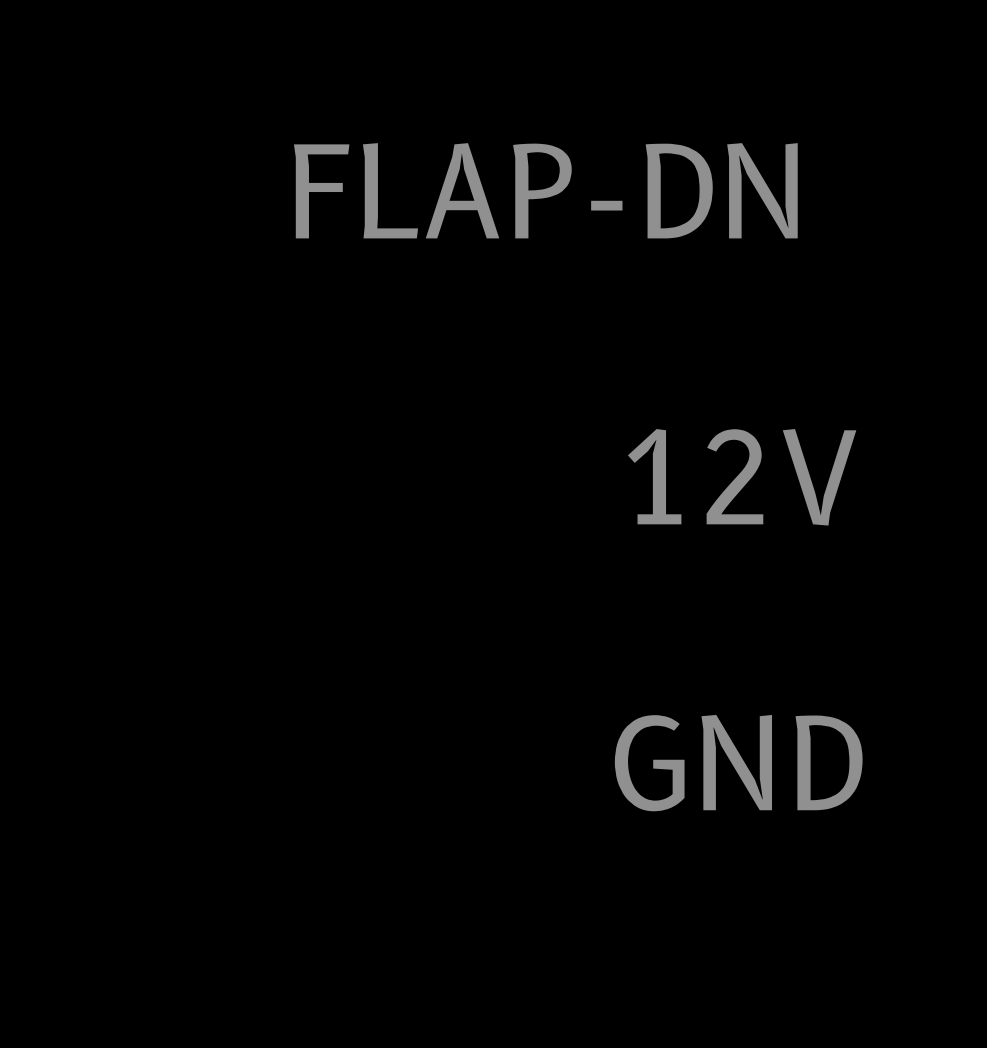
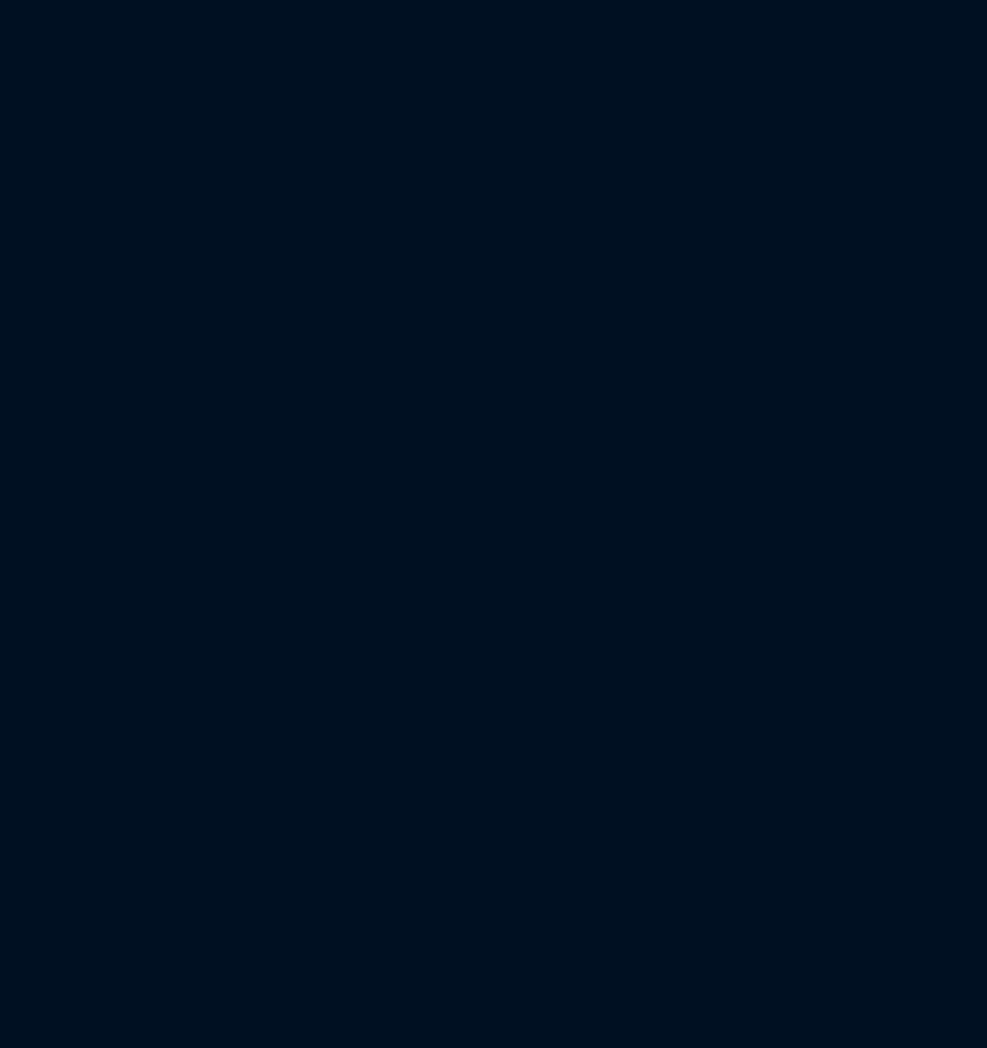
text: FLAP-DN (545, 190) -> none
text: 12V (742, 477) -> none
text: GND (738, 763) -> none

